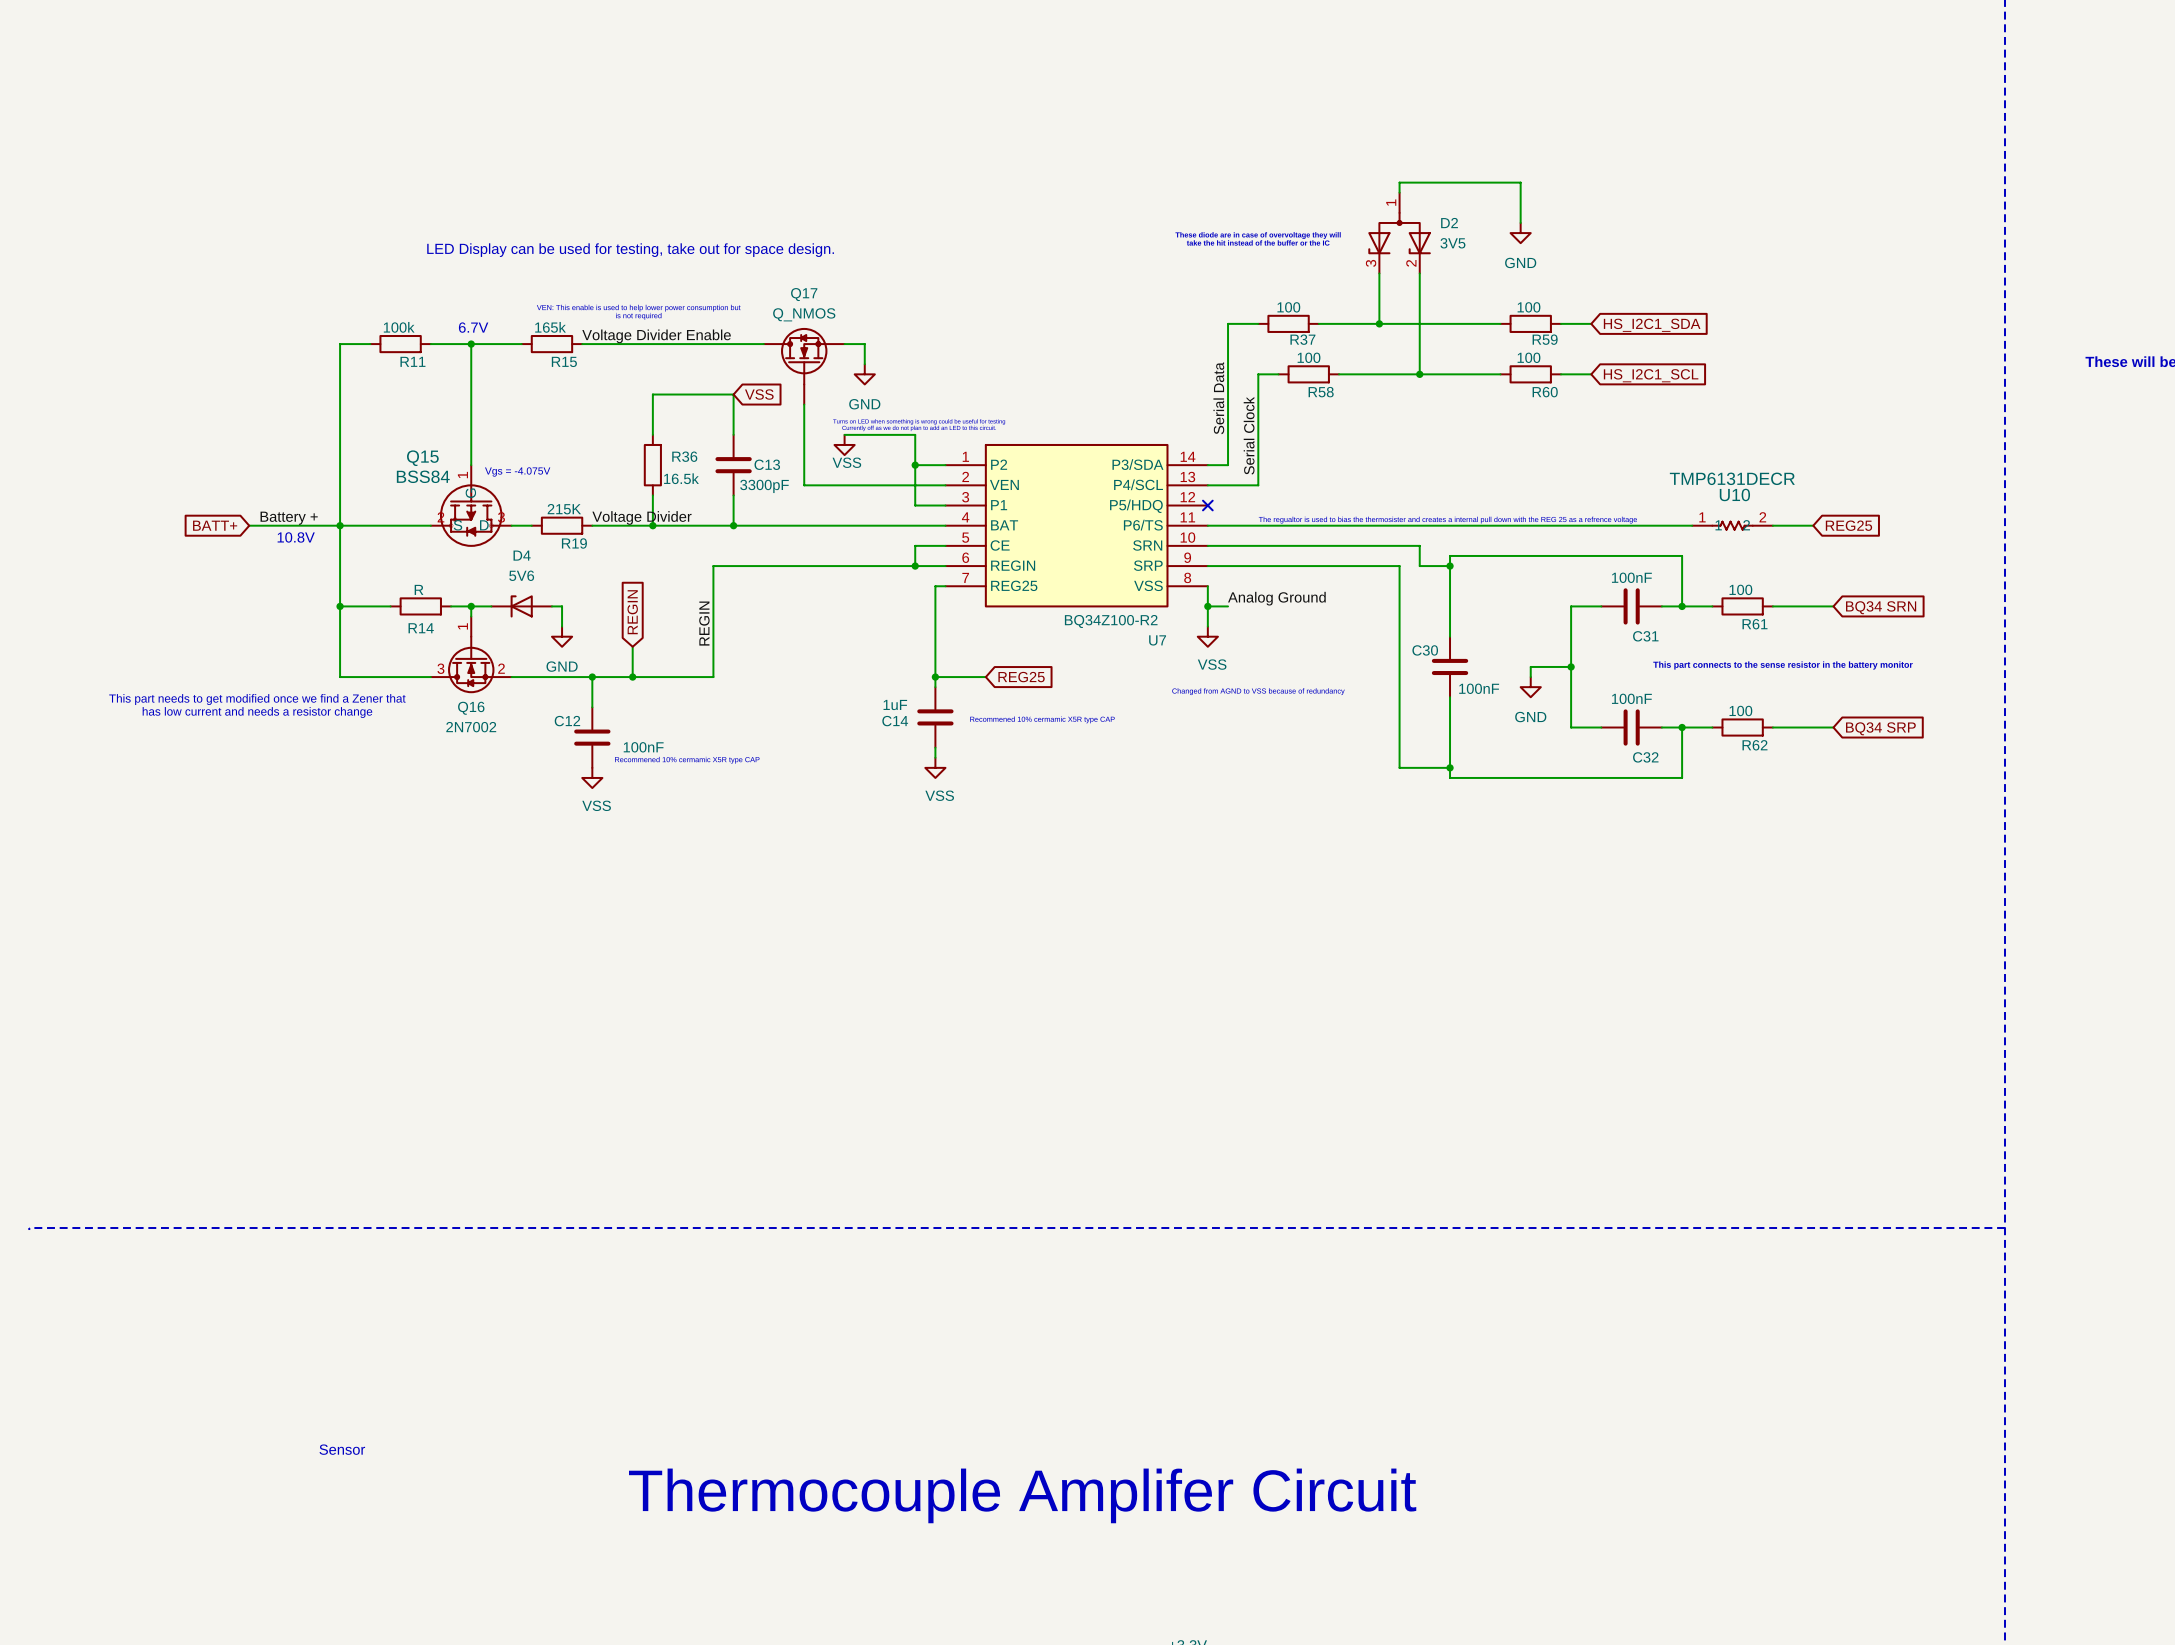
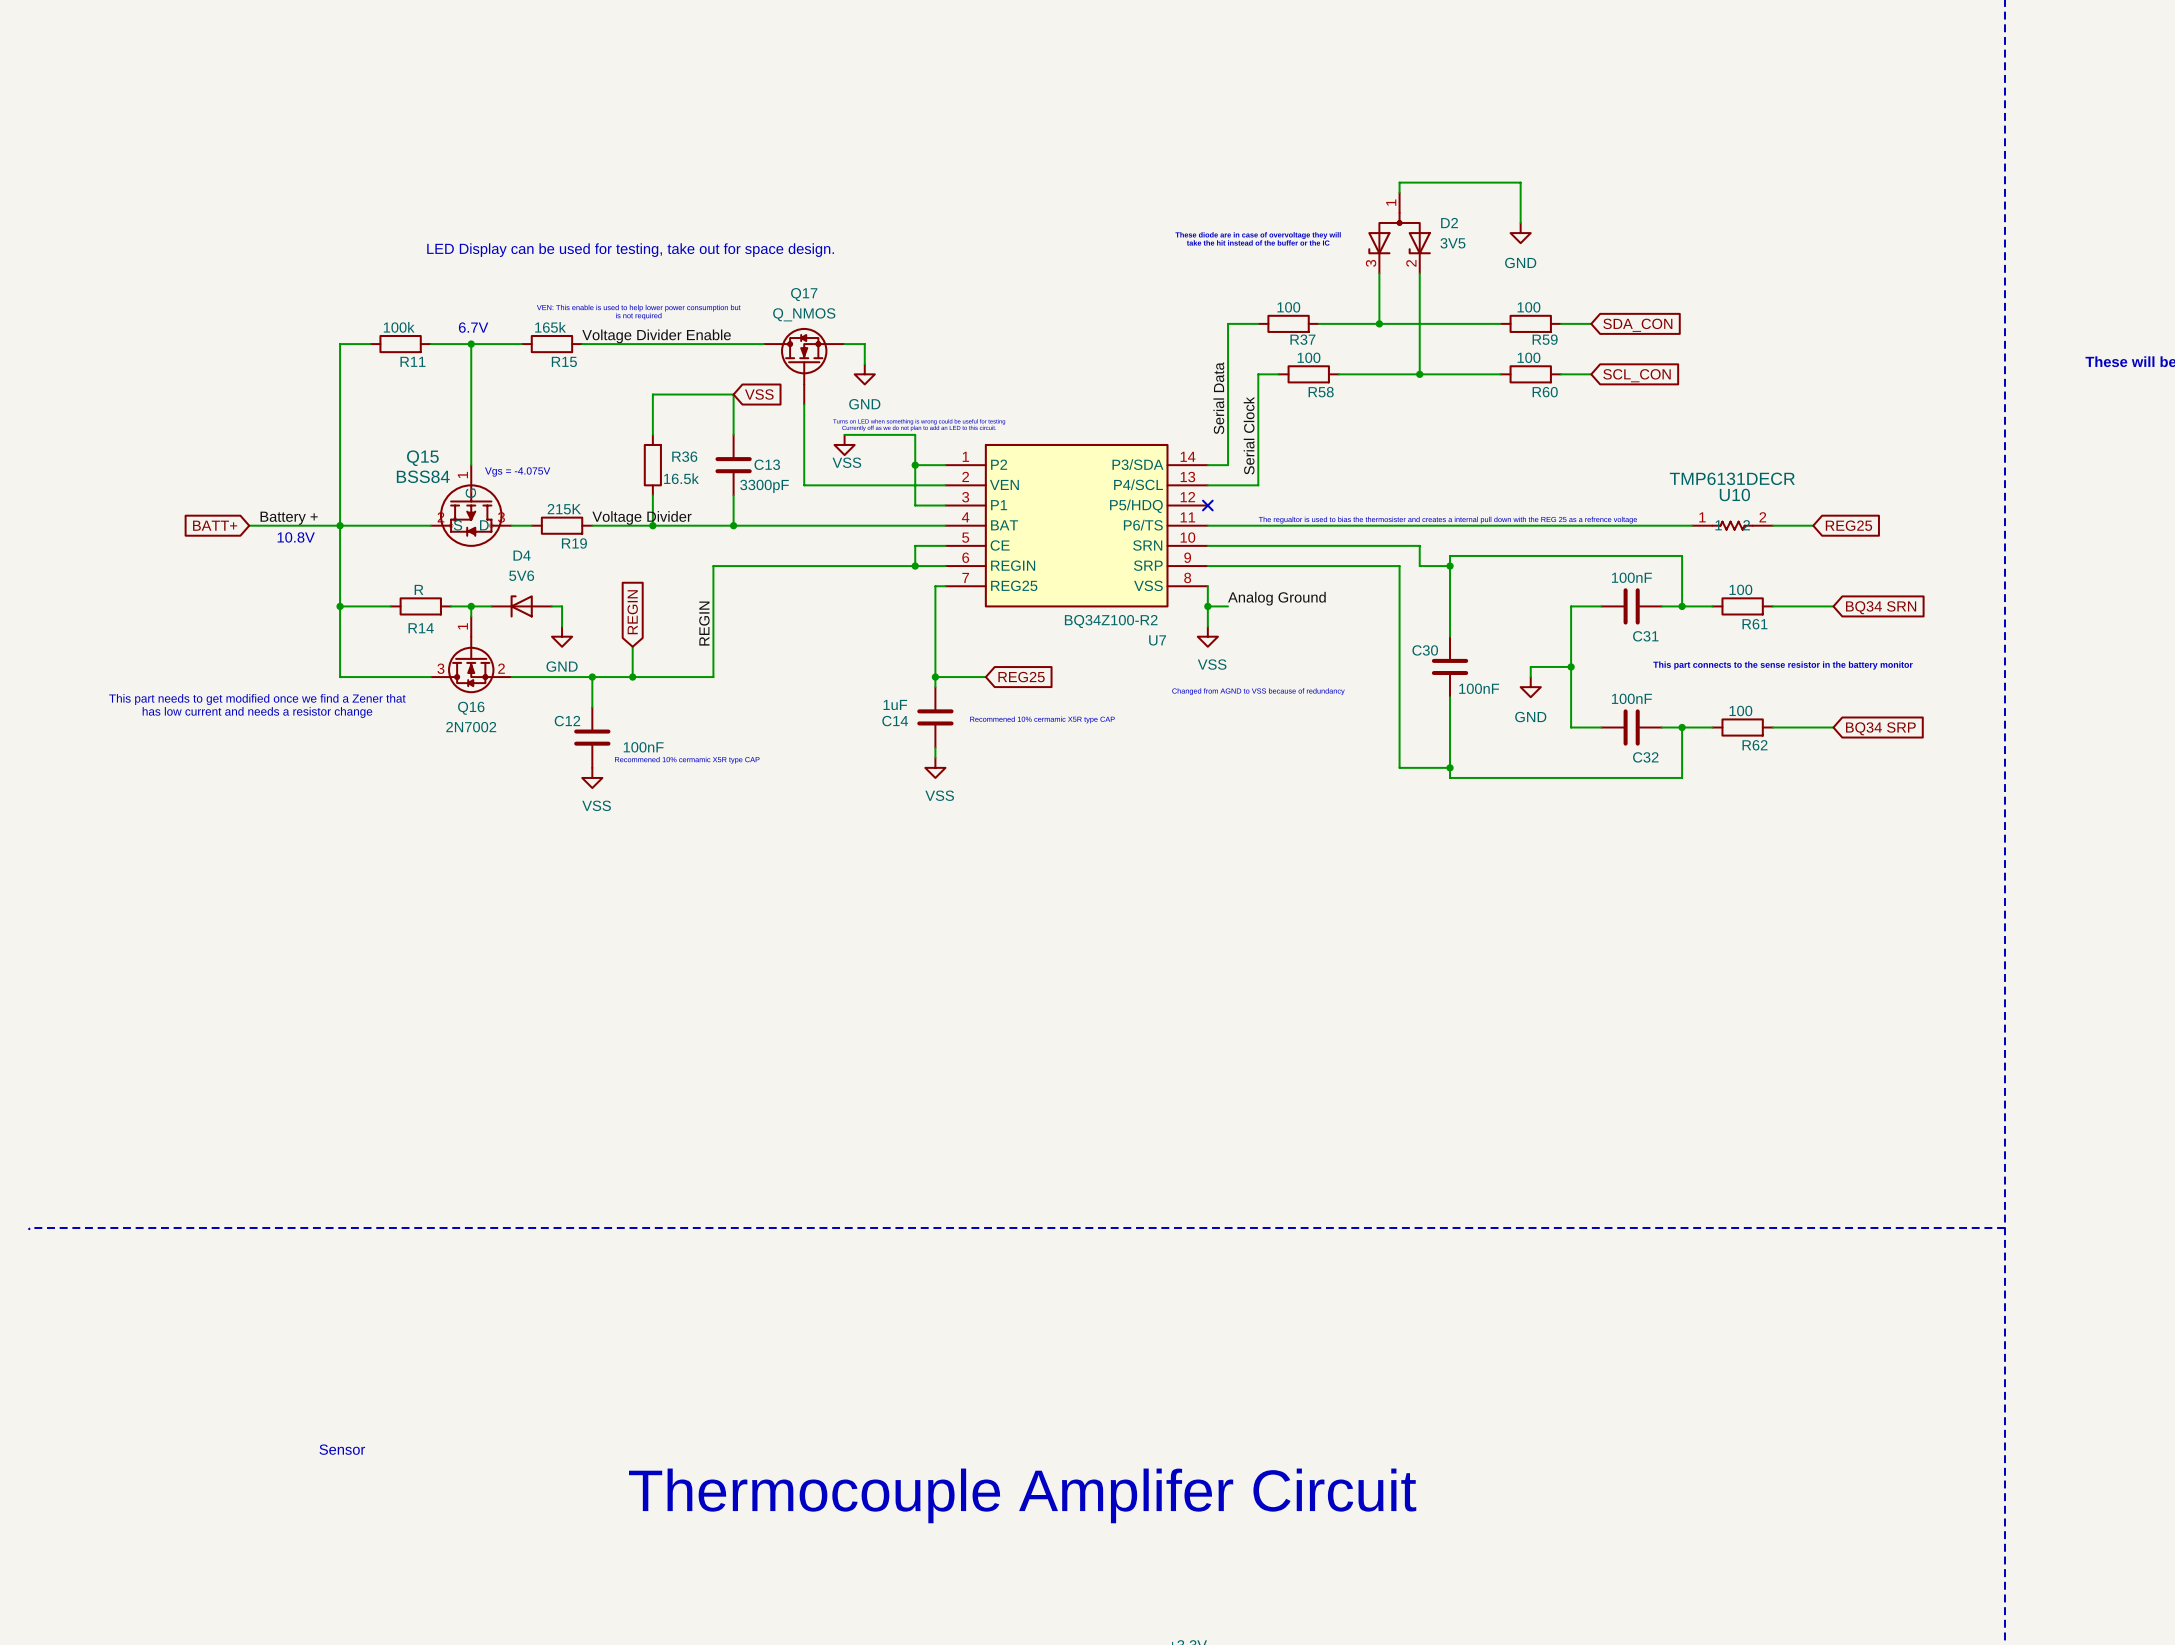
global label: HS_I2C1_SDA (1652, 325) -> SDA_CON (1637, 325)
global label: HS_I2C1_SCL (1651, 375) -> SCL_CON (1637, 375)

